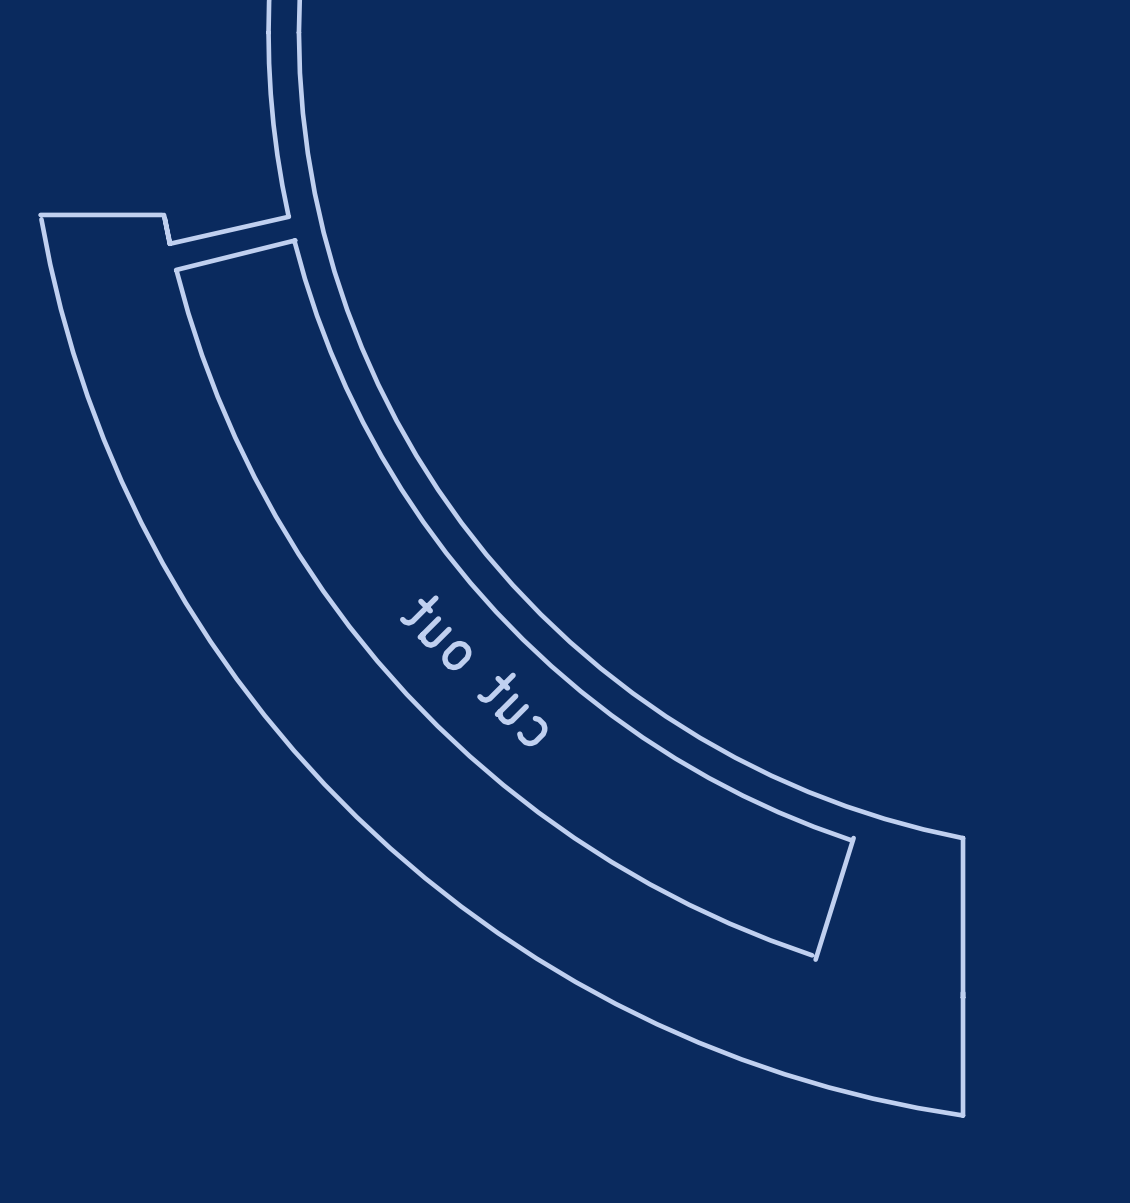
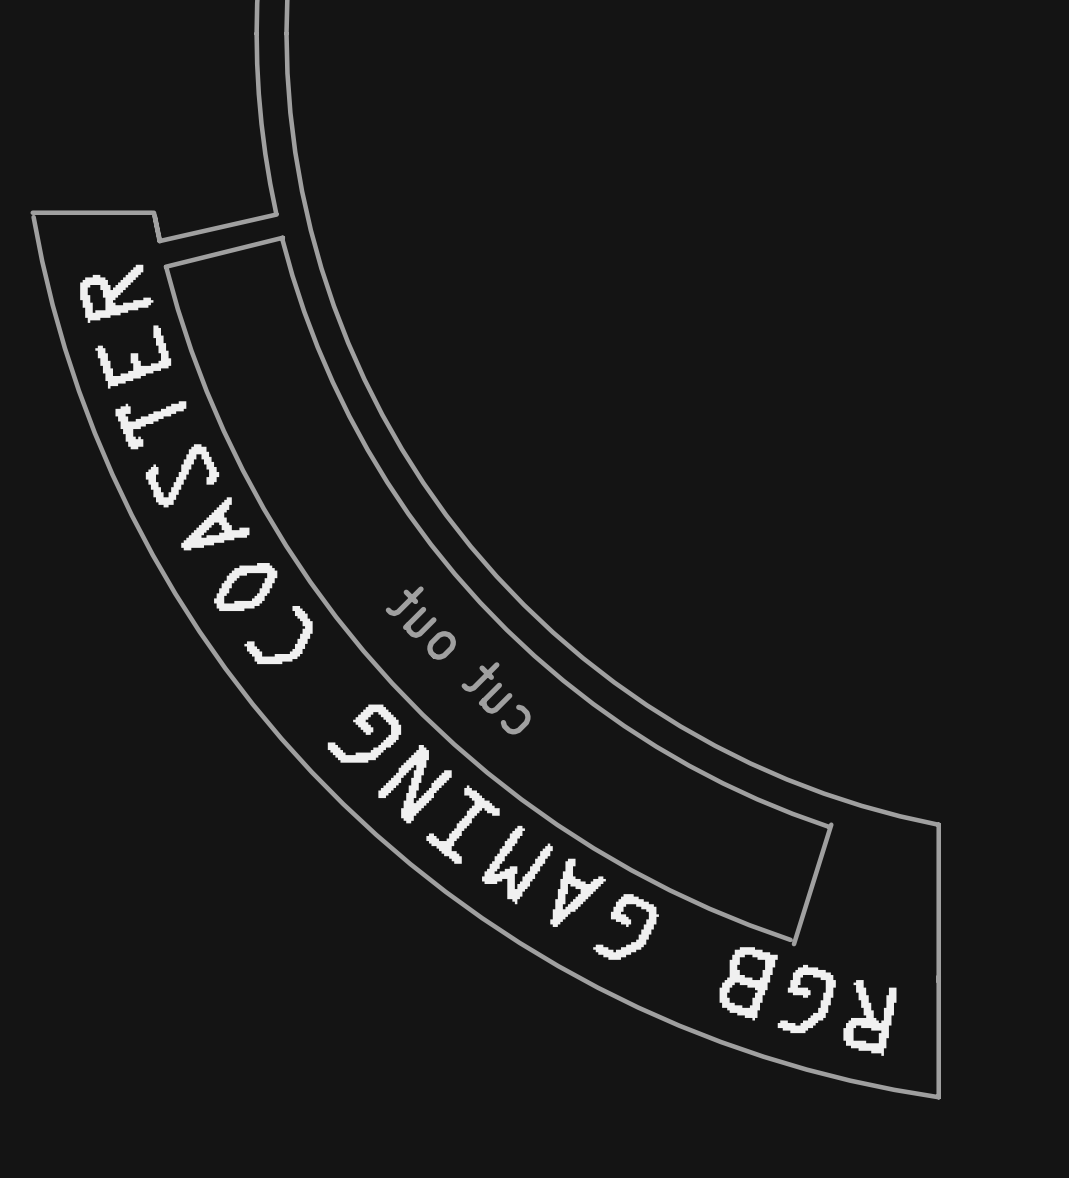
drawing: none -> [80, 264, 313, 665]
drawing: none -> [327, 704, 659, 960]
drawing: none -> [719, 947, 897, 1056]

